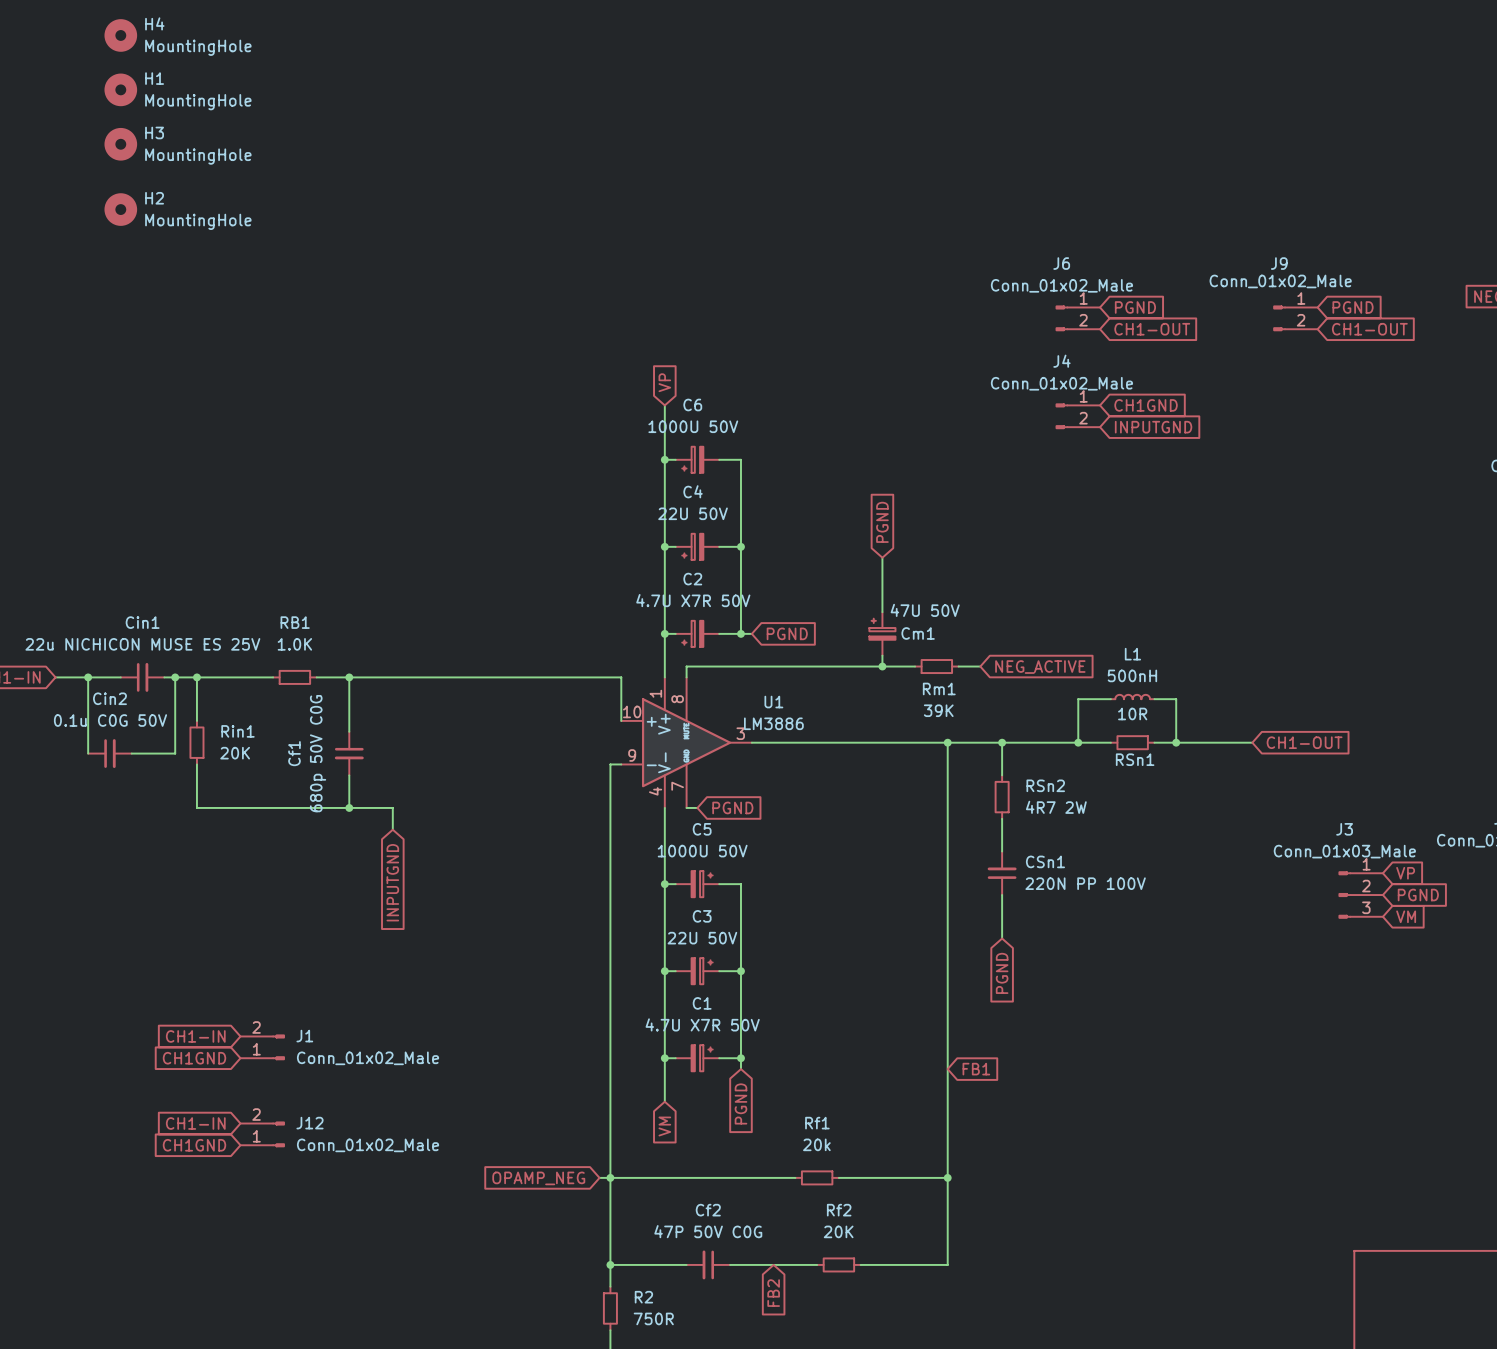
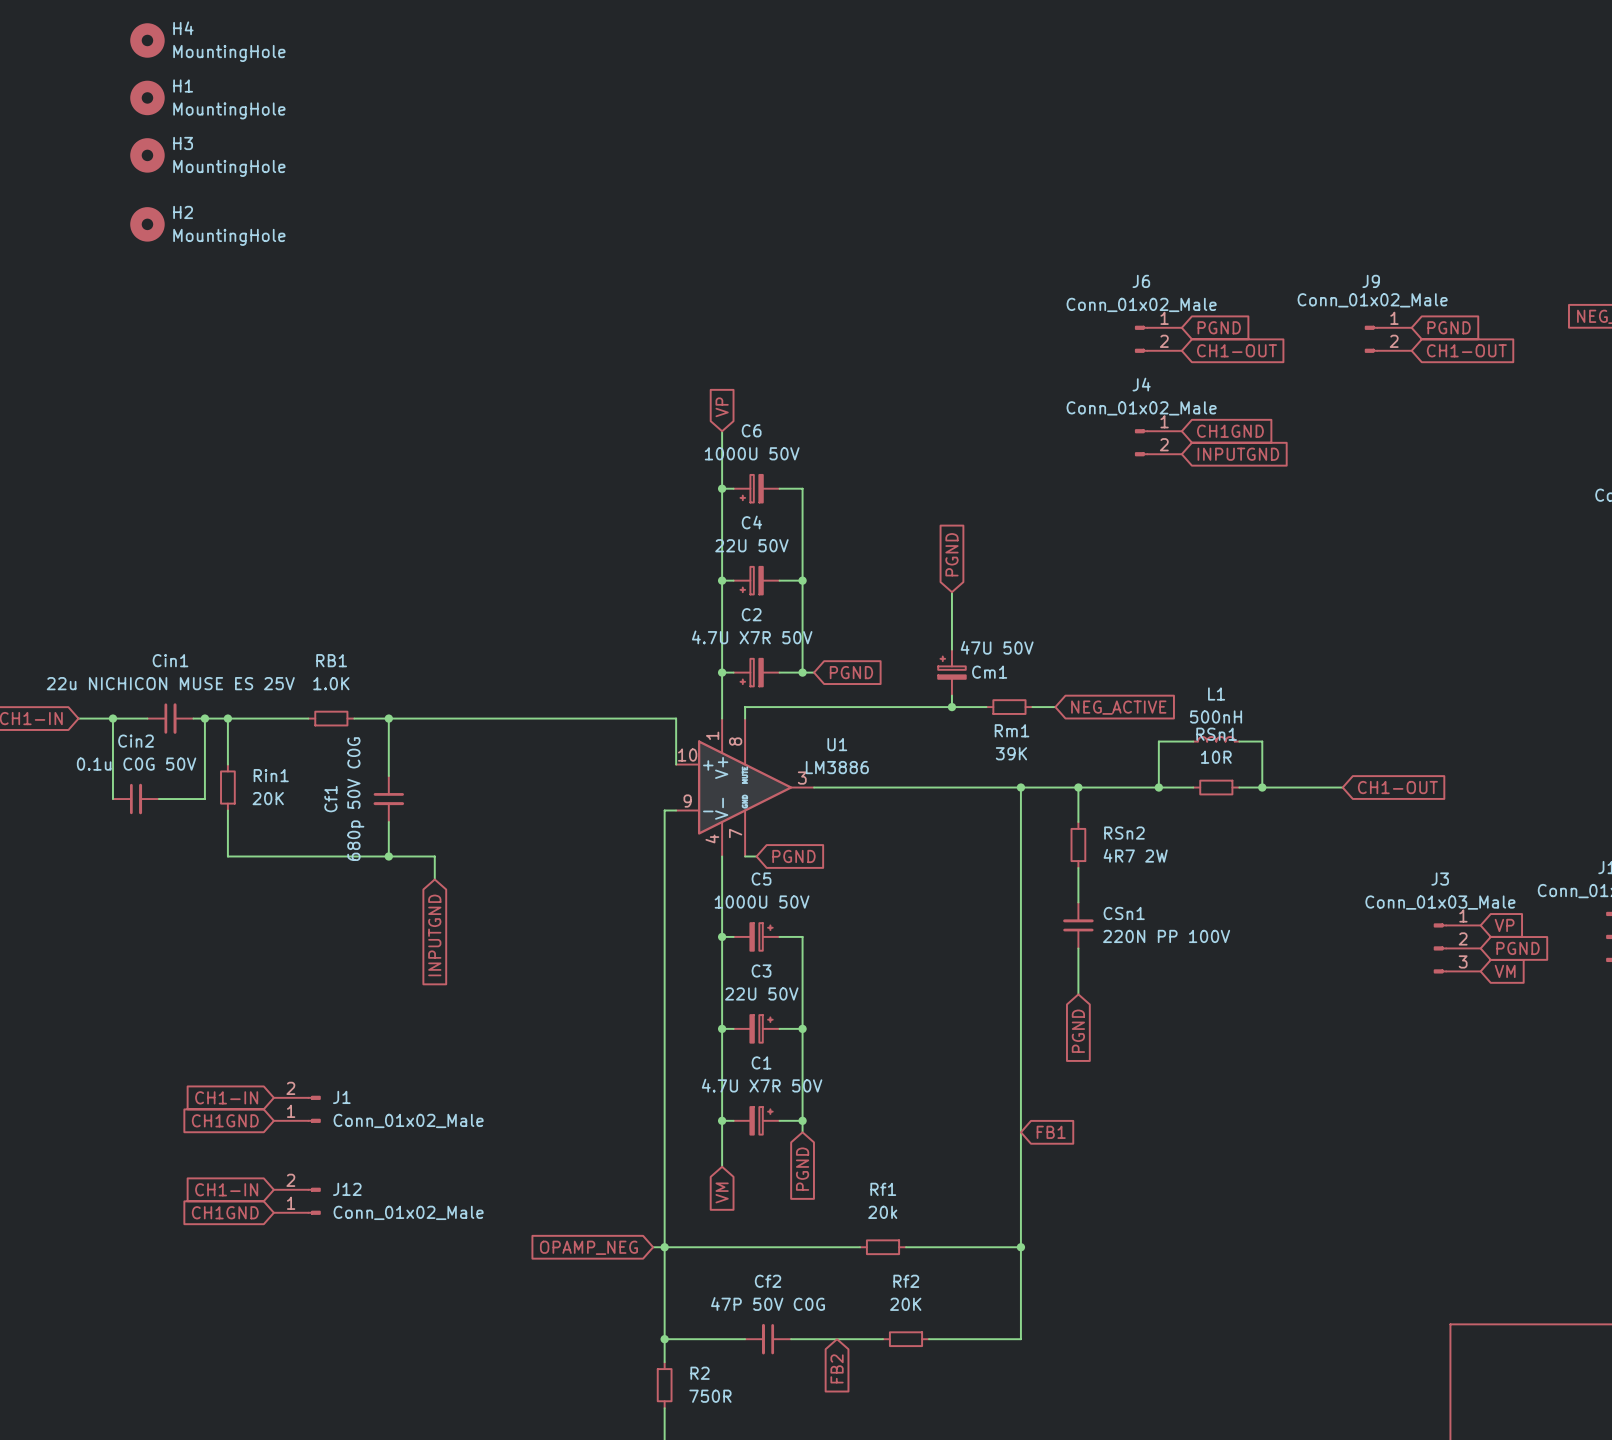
RSn1 name position: RSn1 (1135, 759) -> RSn1 (1216, 734)

